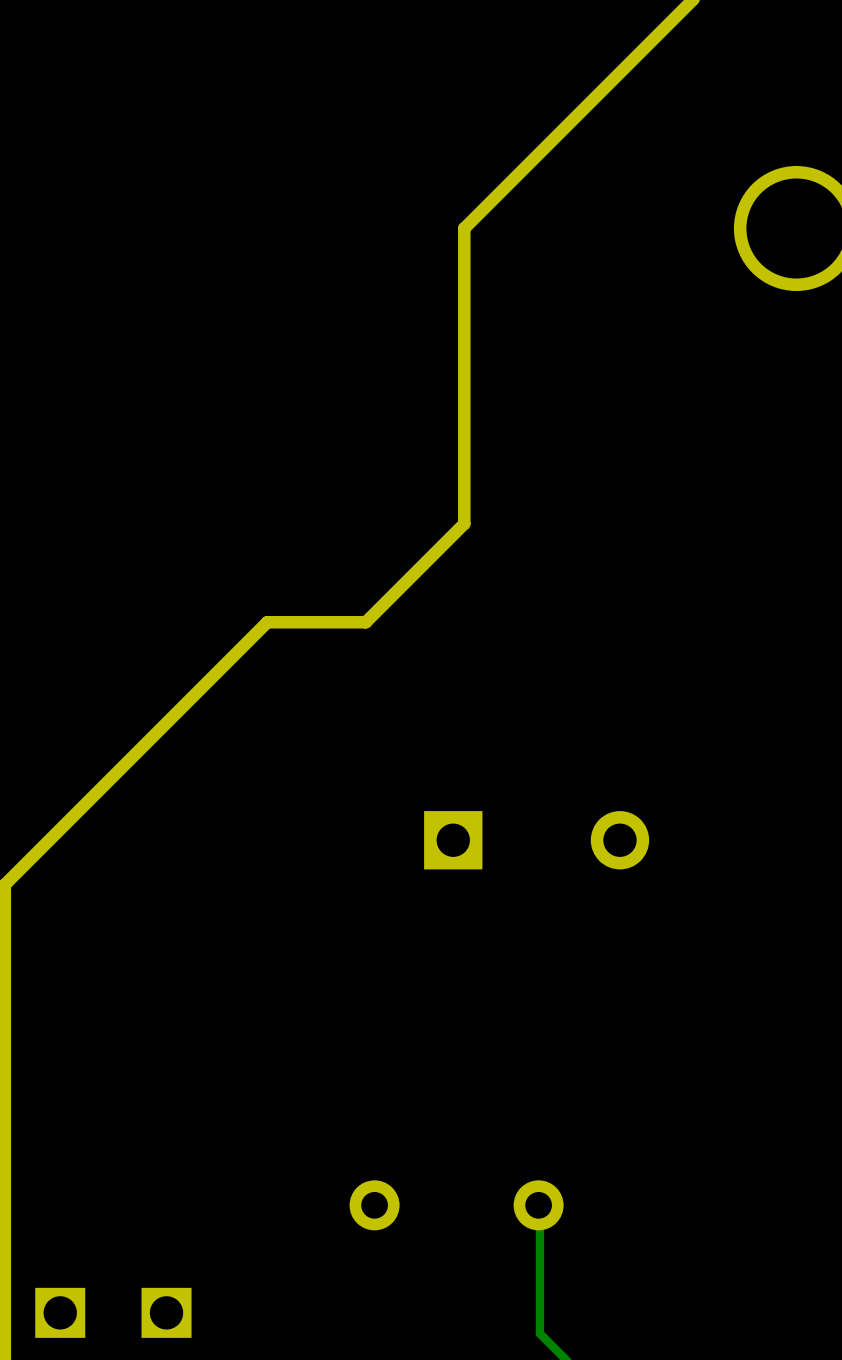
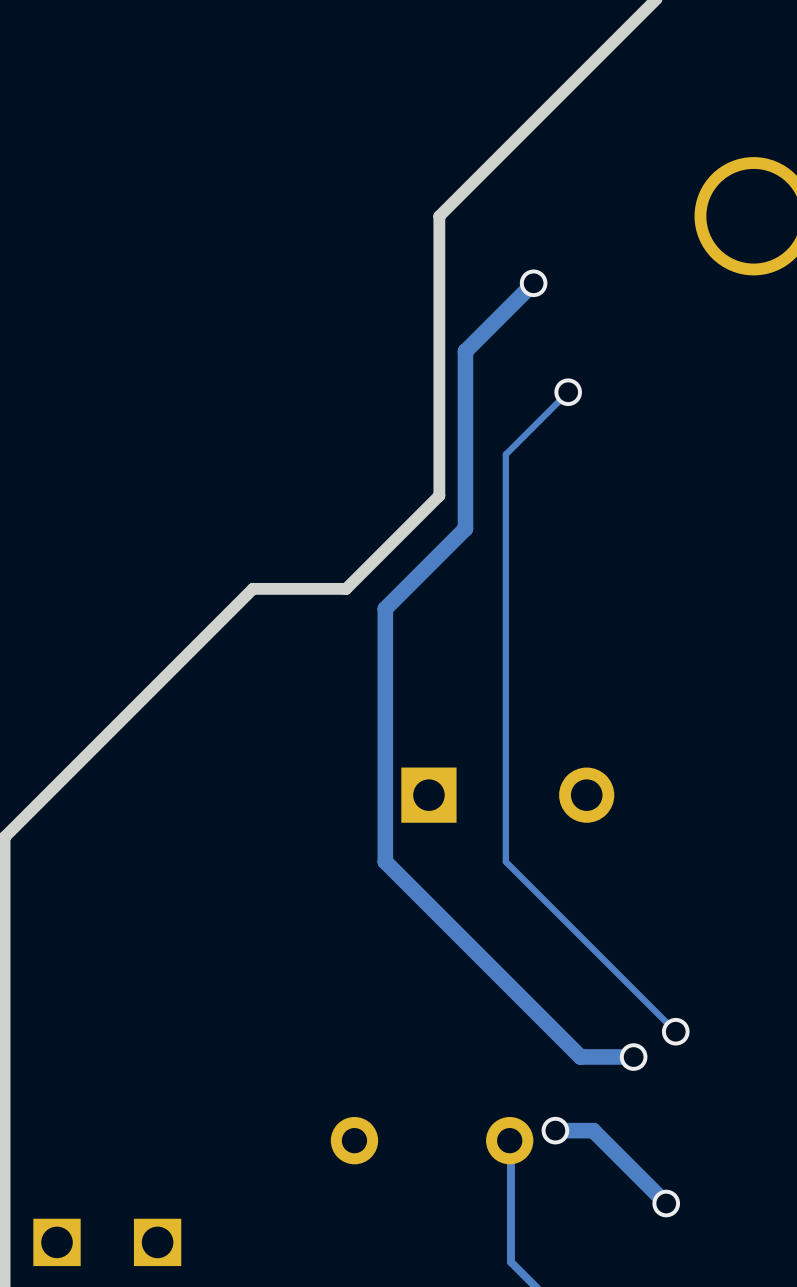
track: none -> (533, 283) (465, 351) (465, 528) (385, 608) (385, 861) (580, 1056) (633, 1056)
via: none -> (533, 283)
track: none -> (568, 392) (505, 454) (505, 861) (675, 1031)
via: none -> (568, 392)
via: none -> (675, 1031)
via: none -> (633, 1057)
track: none -> (555, 1130) (593, 1130) (666, 1203)
via: none -> (555, 1130)
via: none -> (666, 1203)

